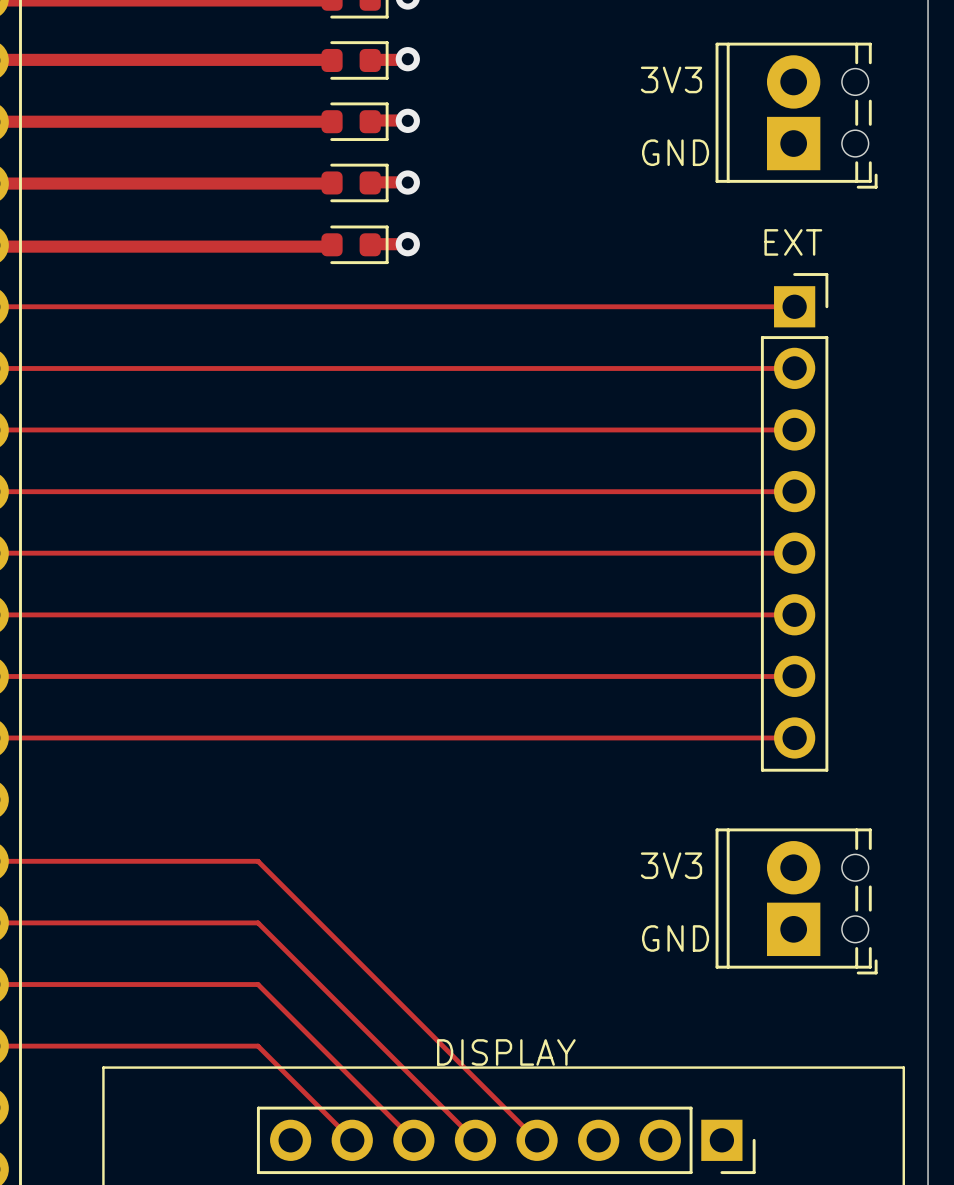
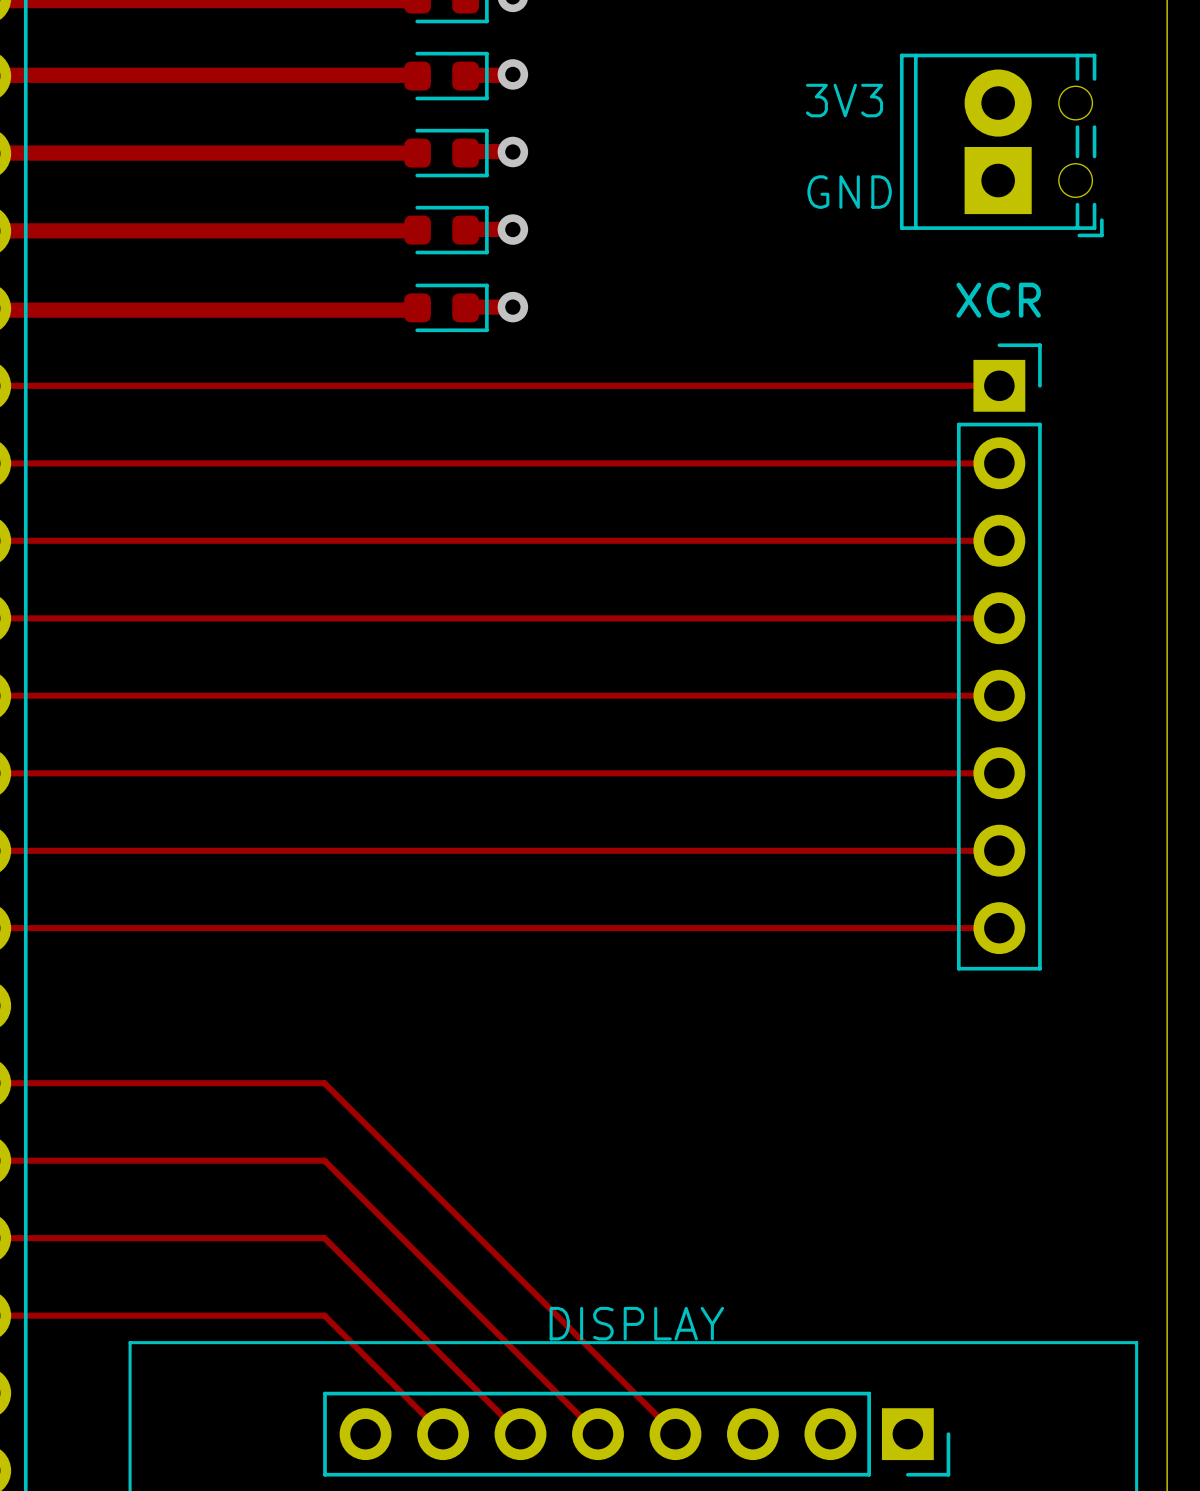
XCR name: none -> XCR (998, 300)
text: EXT (793, 242) -> none
text: 3V3 (671, 865) -> none
part: (796, 901) -> none
text: GND (675, 938) -> none

